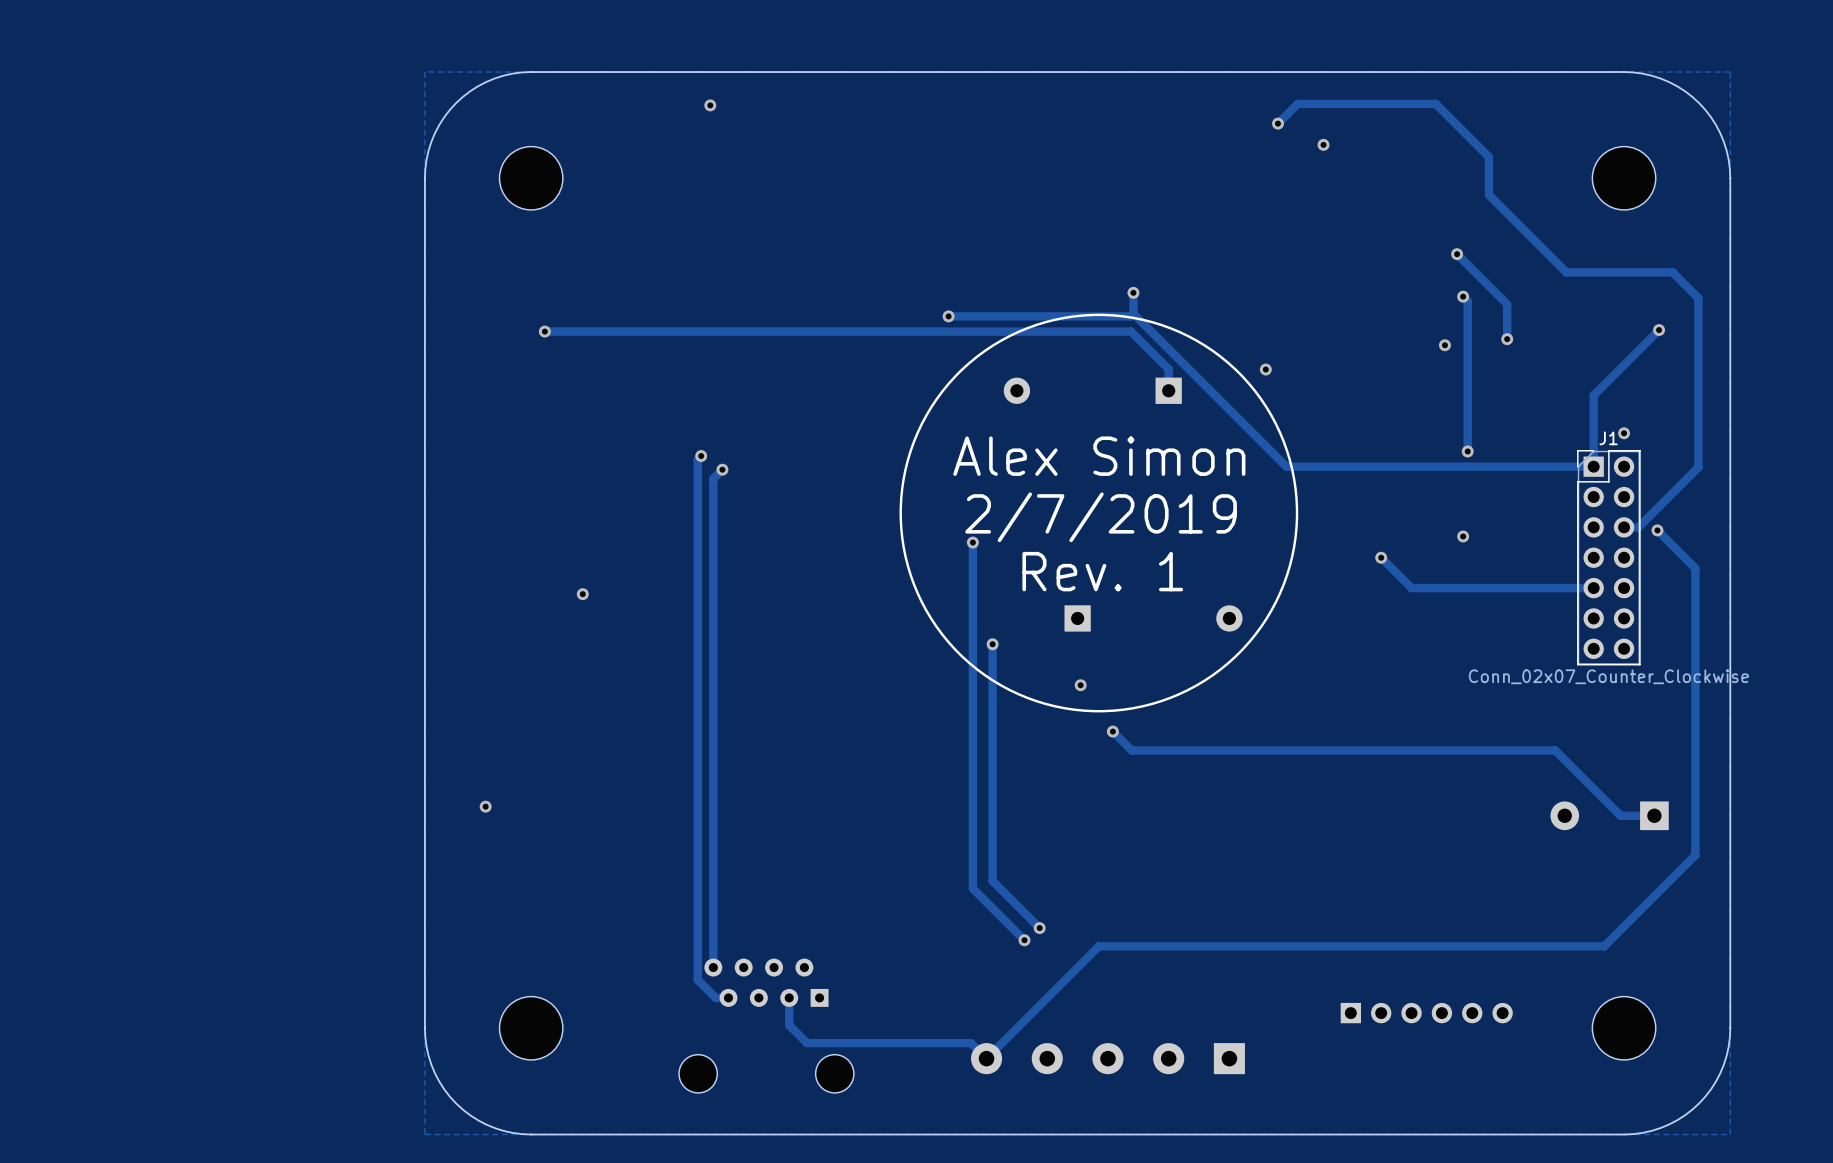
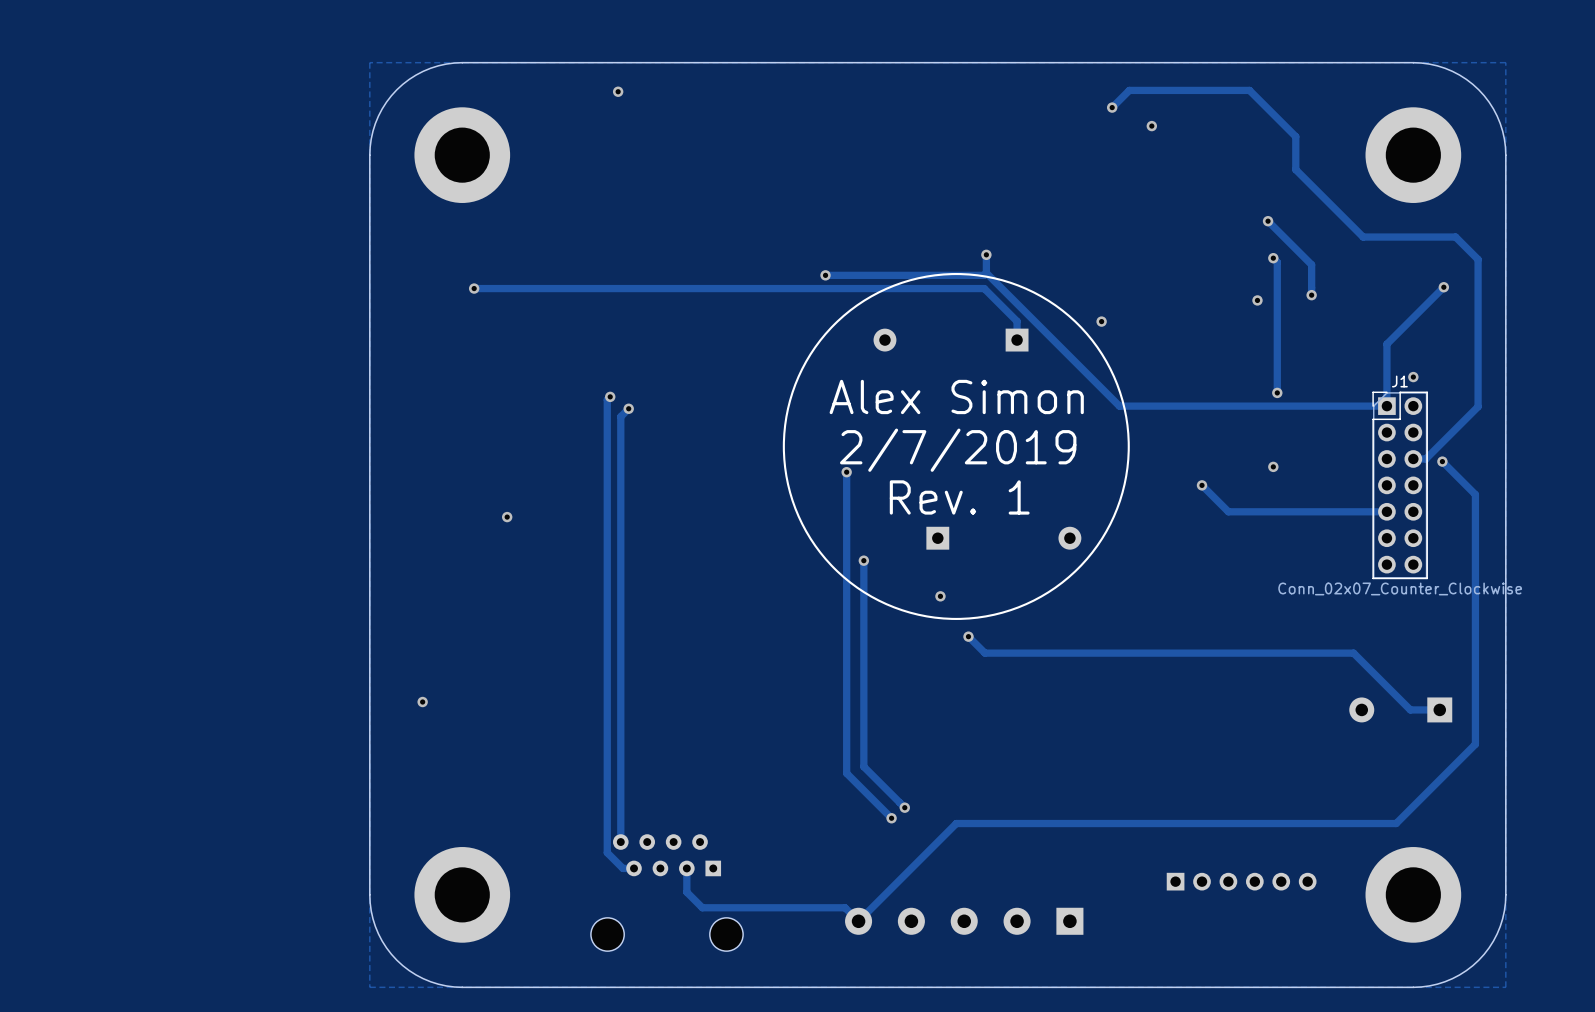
part footprint: [499, 146, 563, 210] -> [414, 107, 511, 203]
part footprint: [1592, 146, 1656, 210] -> [1365, 107, 1462, 203]
part footprint: [499, 996, 563, 1060] -> [414, 847, 511, 943]
part footprint: [1592, 996, 1656, 1060] -> [1365, 847, 1462, 943]

